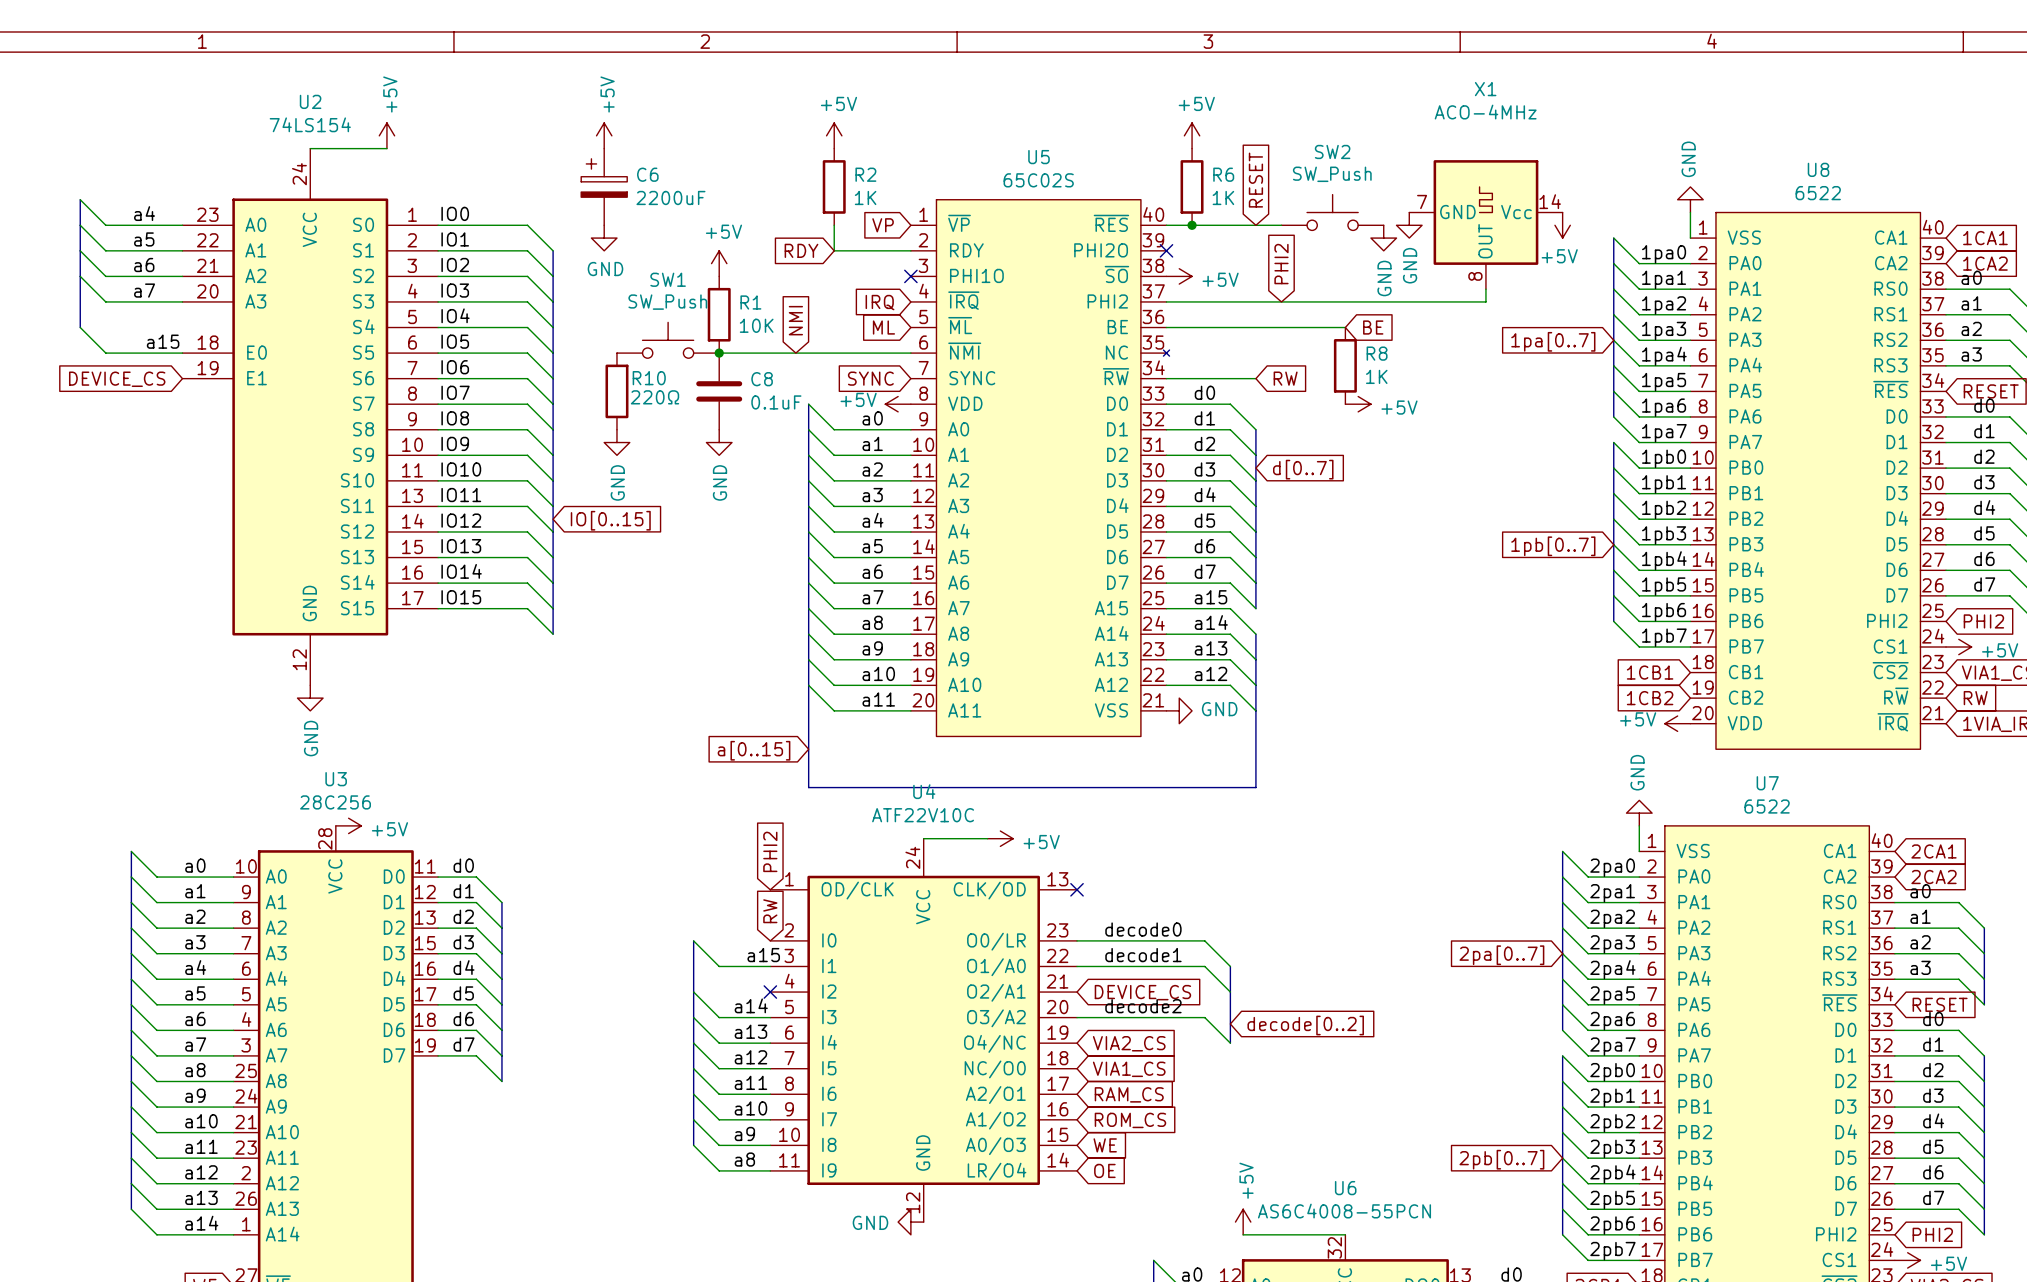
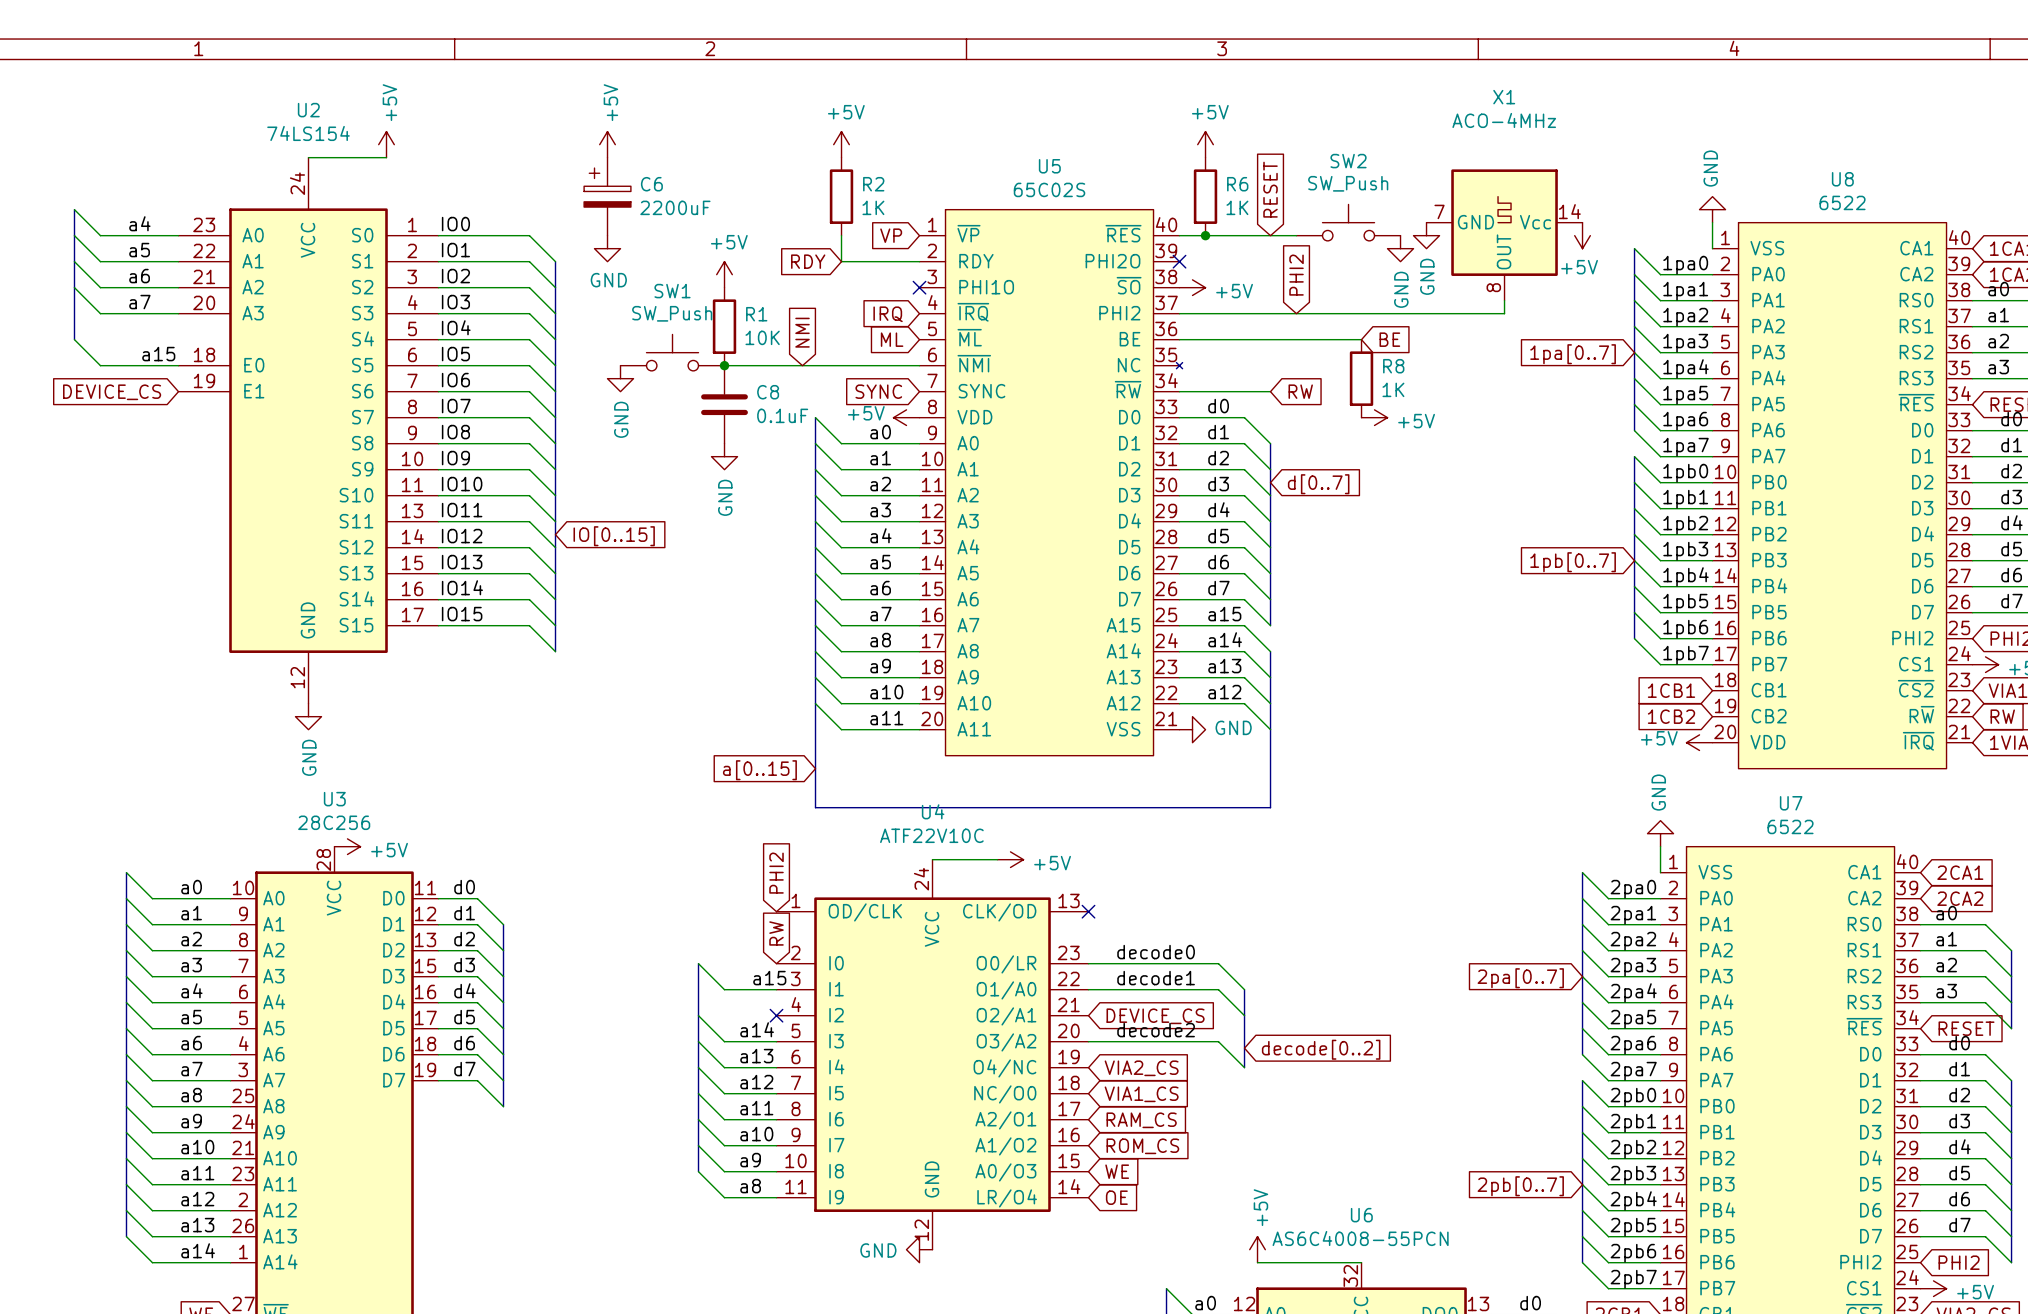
R10: 220Ω (616, 391) -> none
power symbol position: GND (616, 442) -> GND (620, 378)

